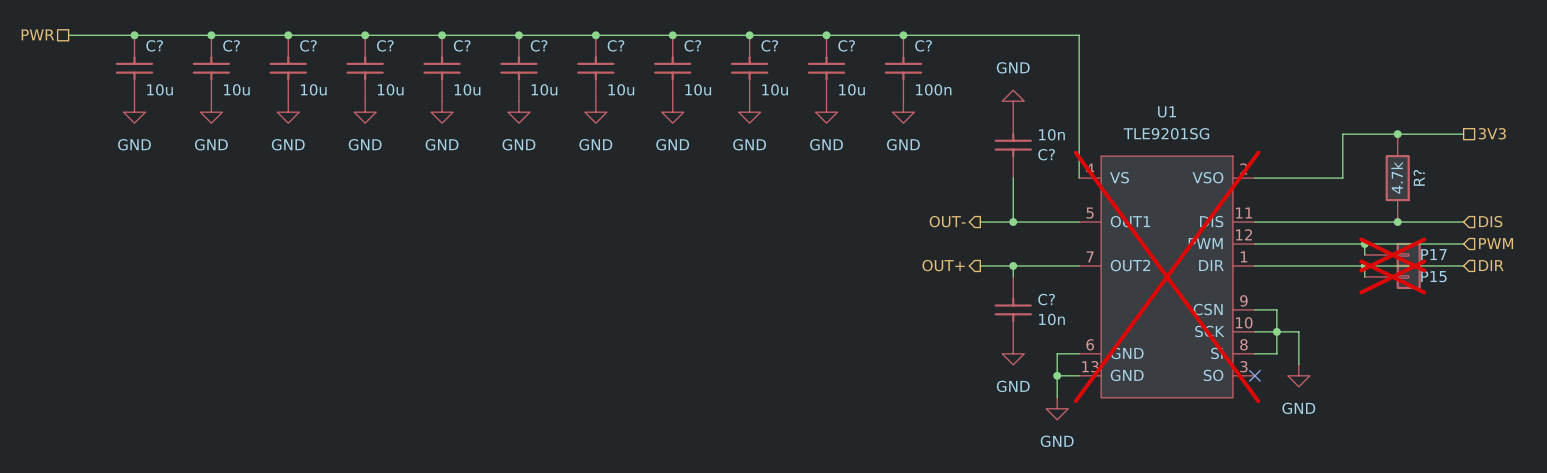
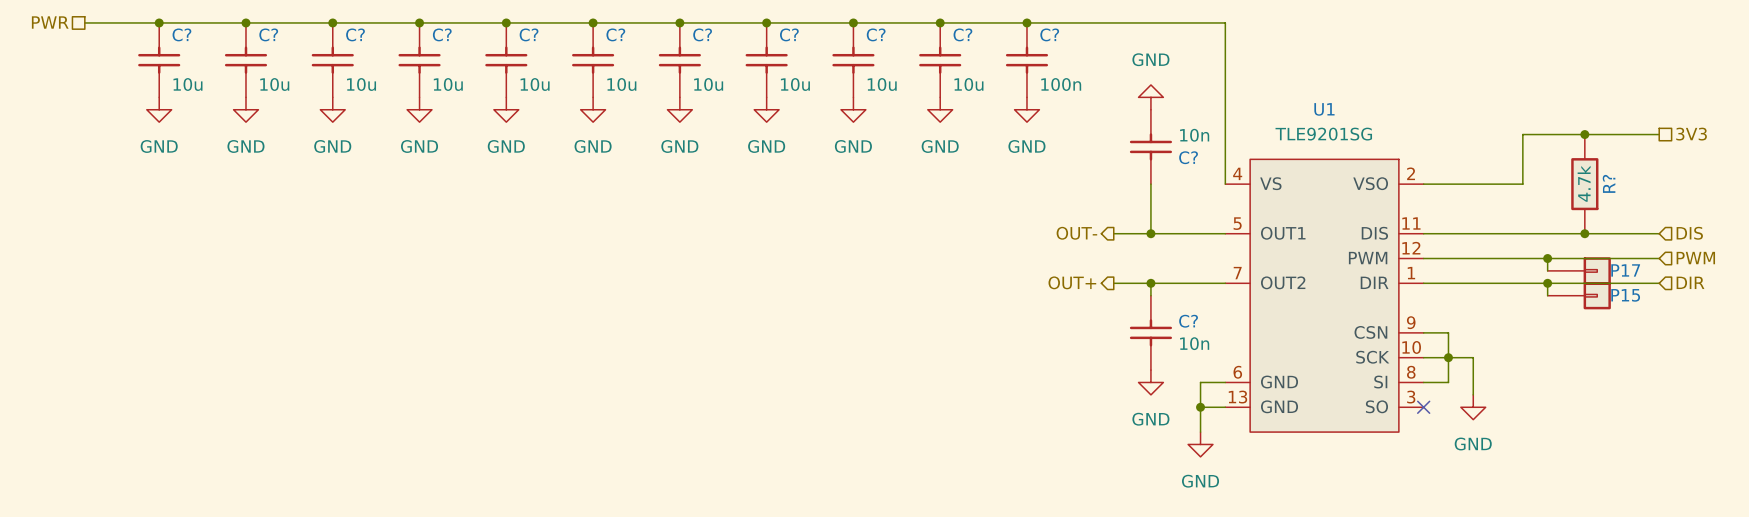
P17 do-not-place cross: (1392, 254) -> none
U1 do-not-place cross: (1167, 276) -> none
P15 do-not-place cross: (1392, 276) -> none

